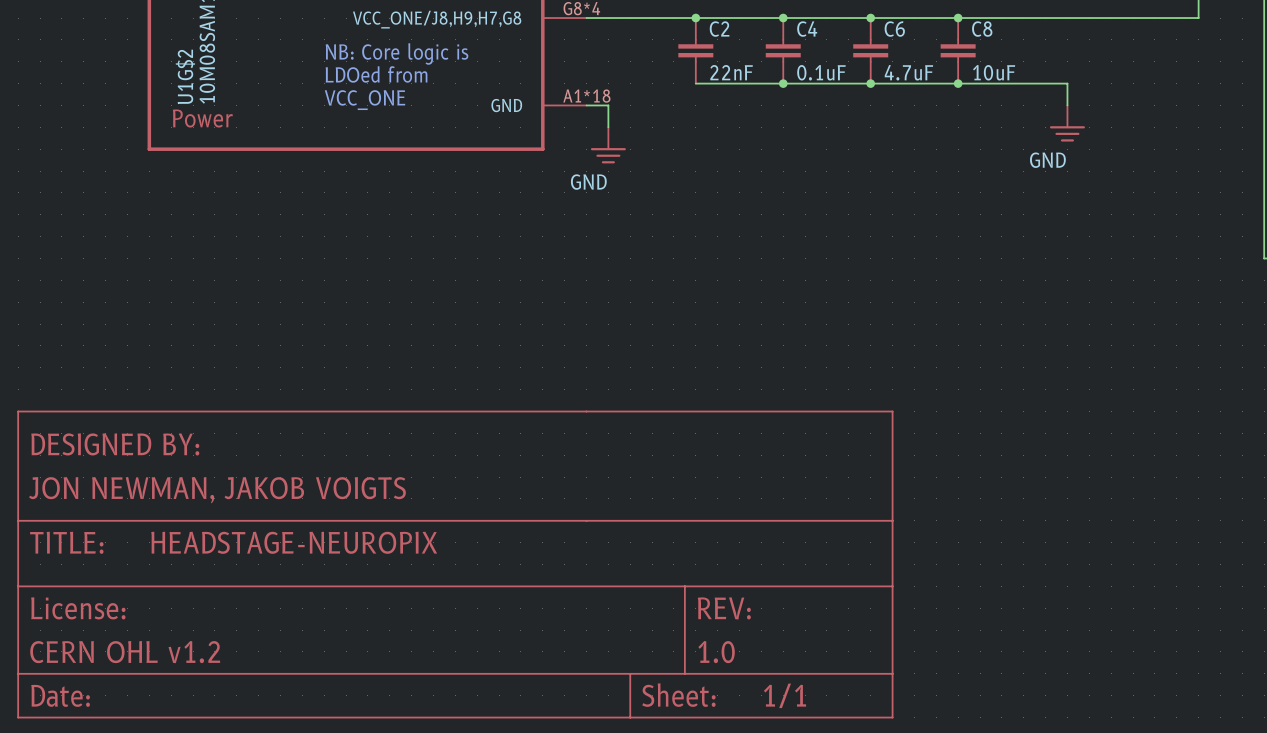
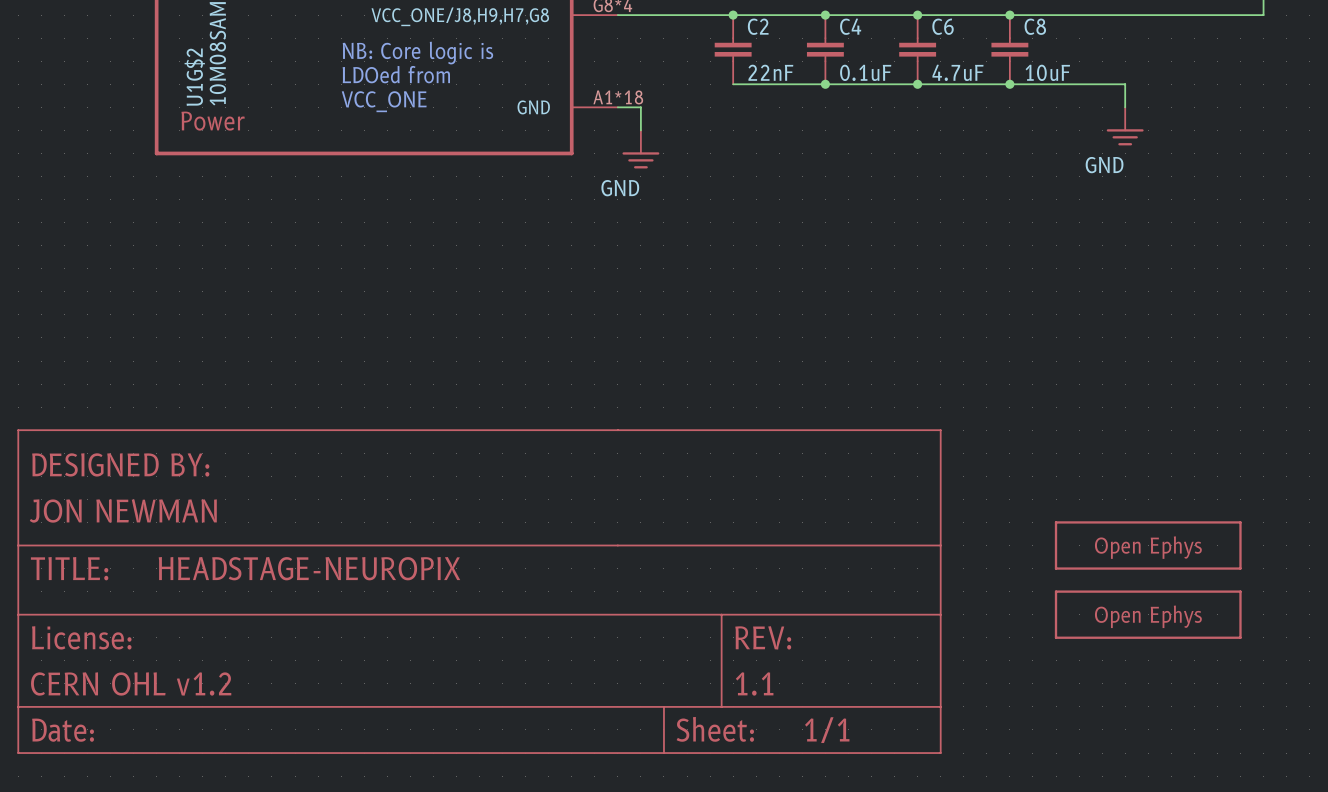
part text: JON NEWMAN, JAKOB VOIGTS (217, 490) -> JON NEWMAN (123, 511)
part: none -> (1148, 545)
part: none -> (1148, 614)
part text: 1.0 (716, 652) -> 1.1 (754, 683)

